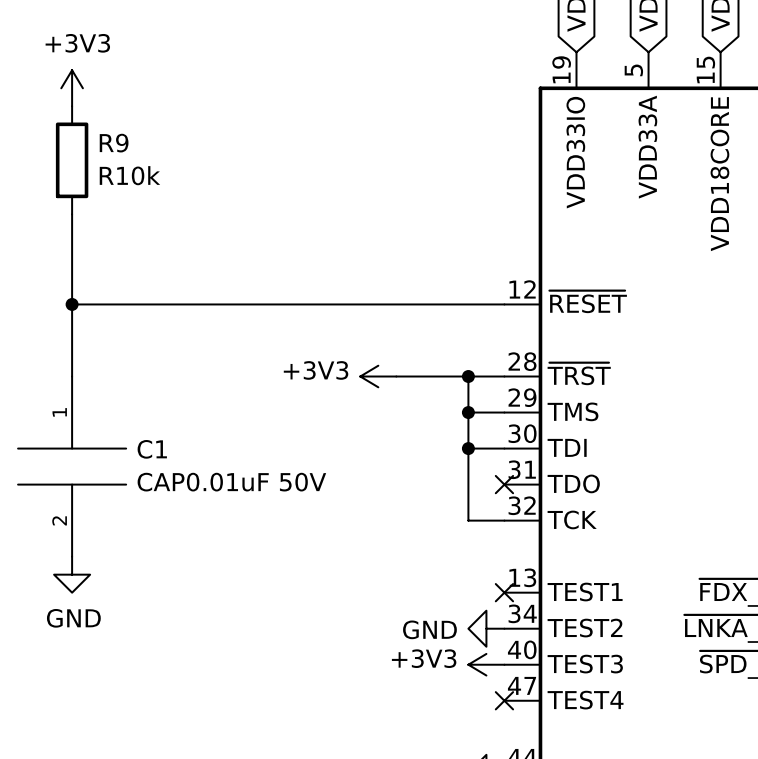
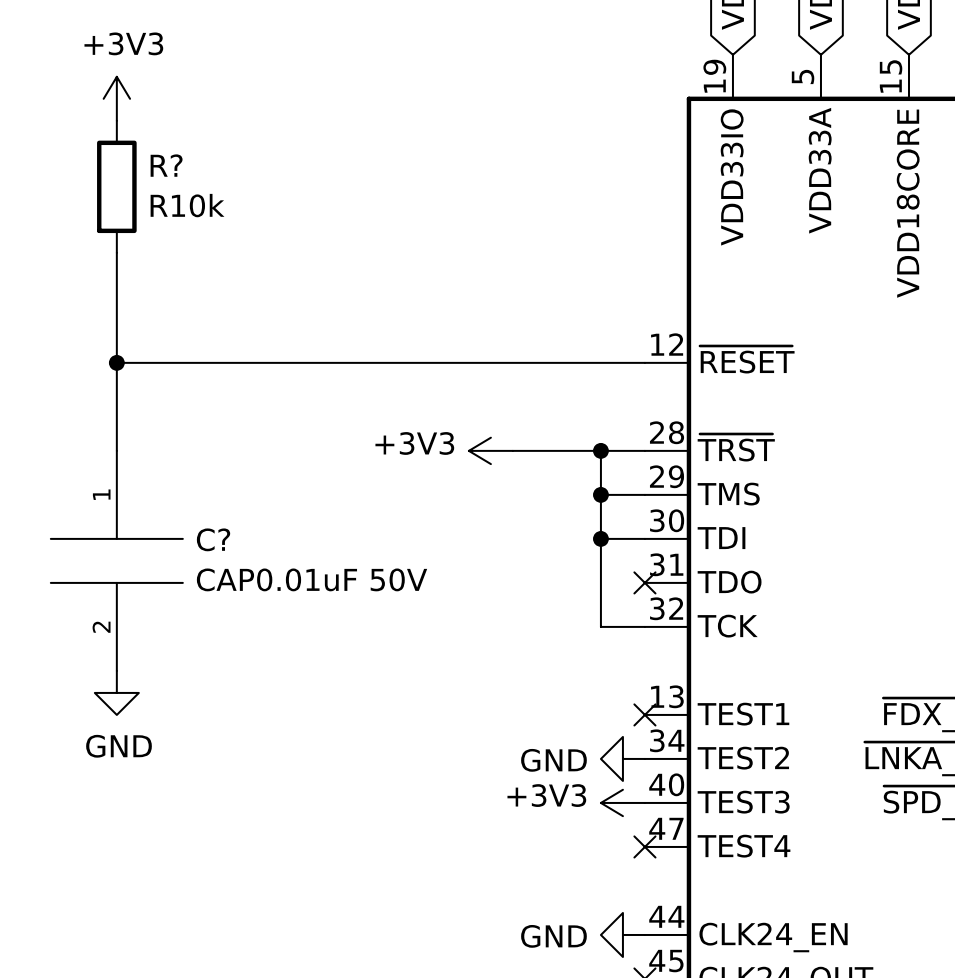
R9 name: R9 (114, 143) -> R? (166, 165)
C1 name: C1 (152, 449) -> C? (213, 539)

